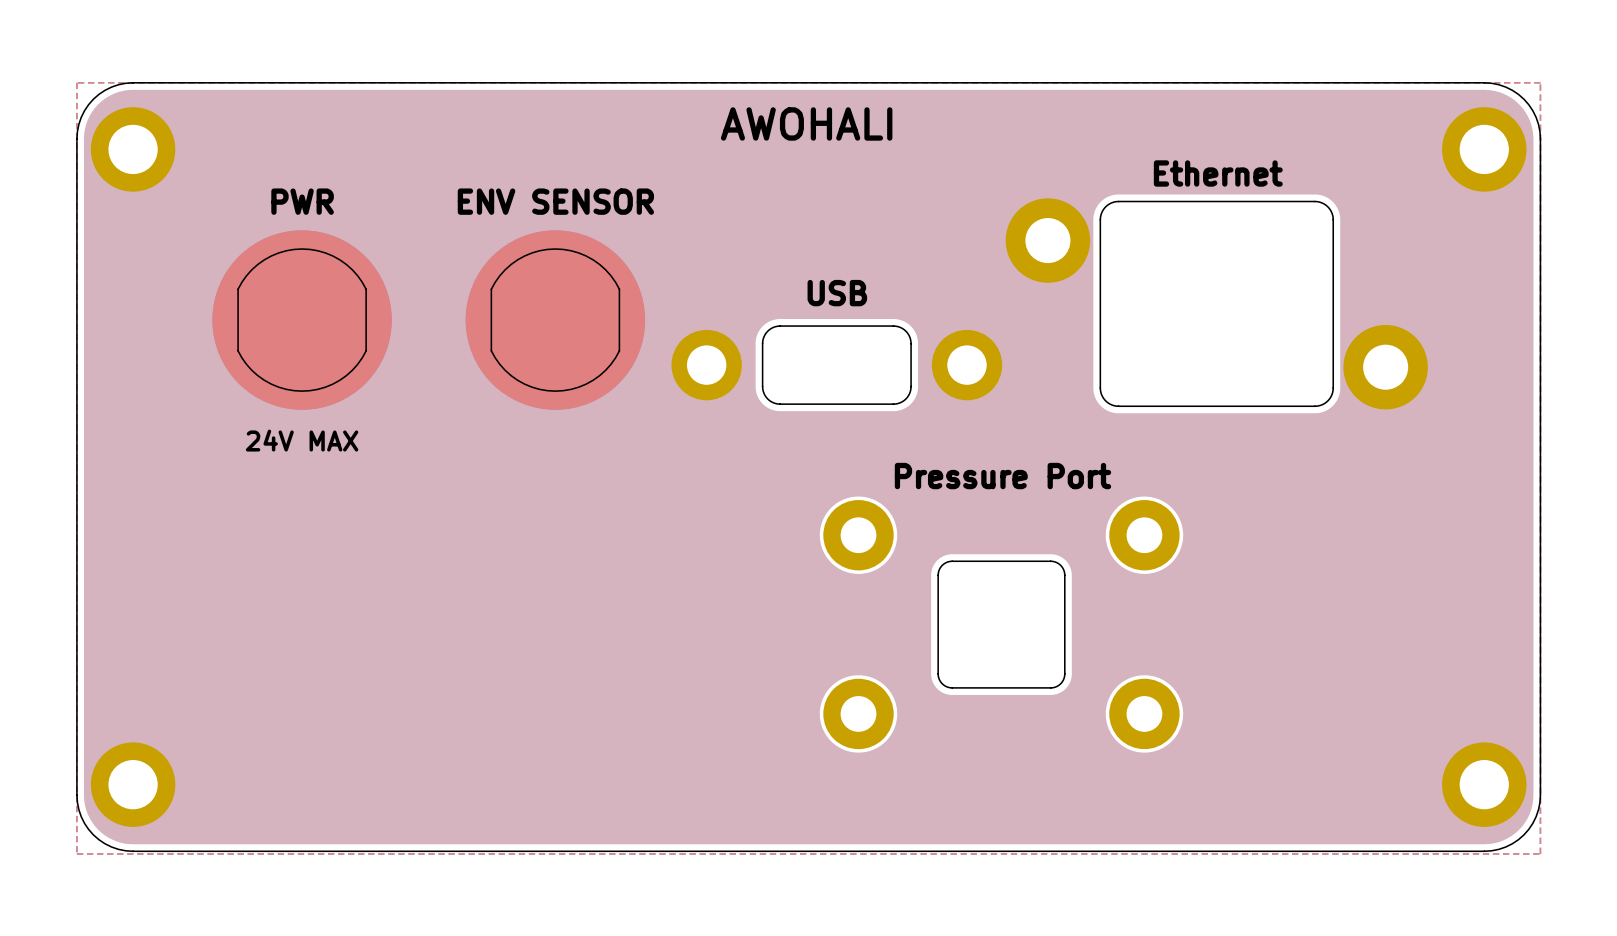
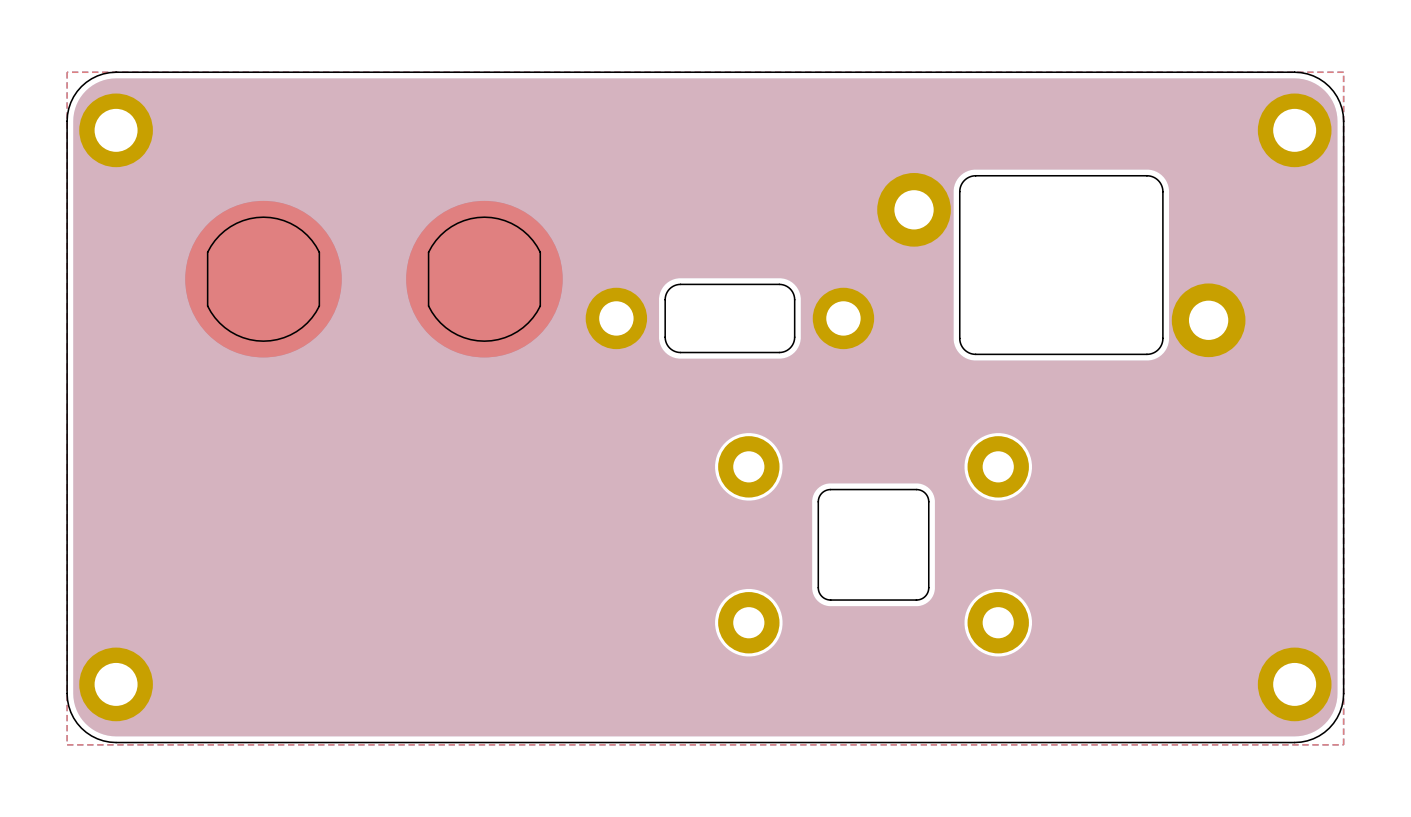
text: AWOHALI (806, 123) -> none
text: Ethernet (1218, 173) -> none
text: PWR (302, 201) -> none
text: ENV SENSOR (555, 201) -> none
text: USB (837, 293) -> none
text: 24V MAX (302, 440) -> none
text: Pressure Port (1002, 476) -> none

